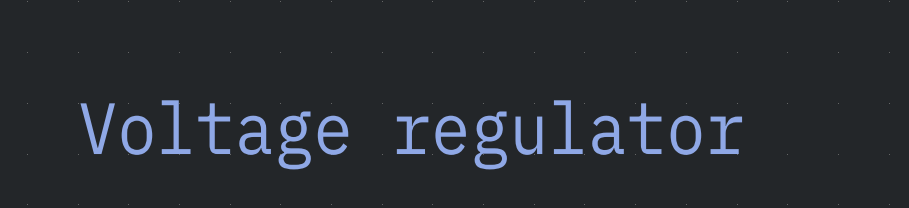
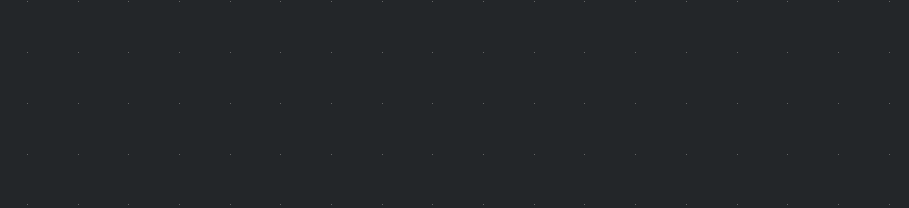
text: Voltage regulator (411, 134) -> none

